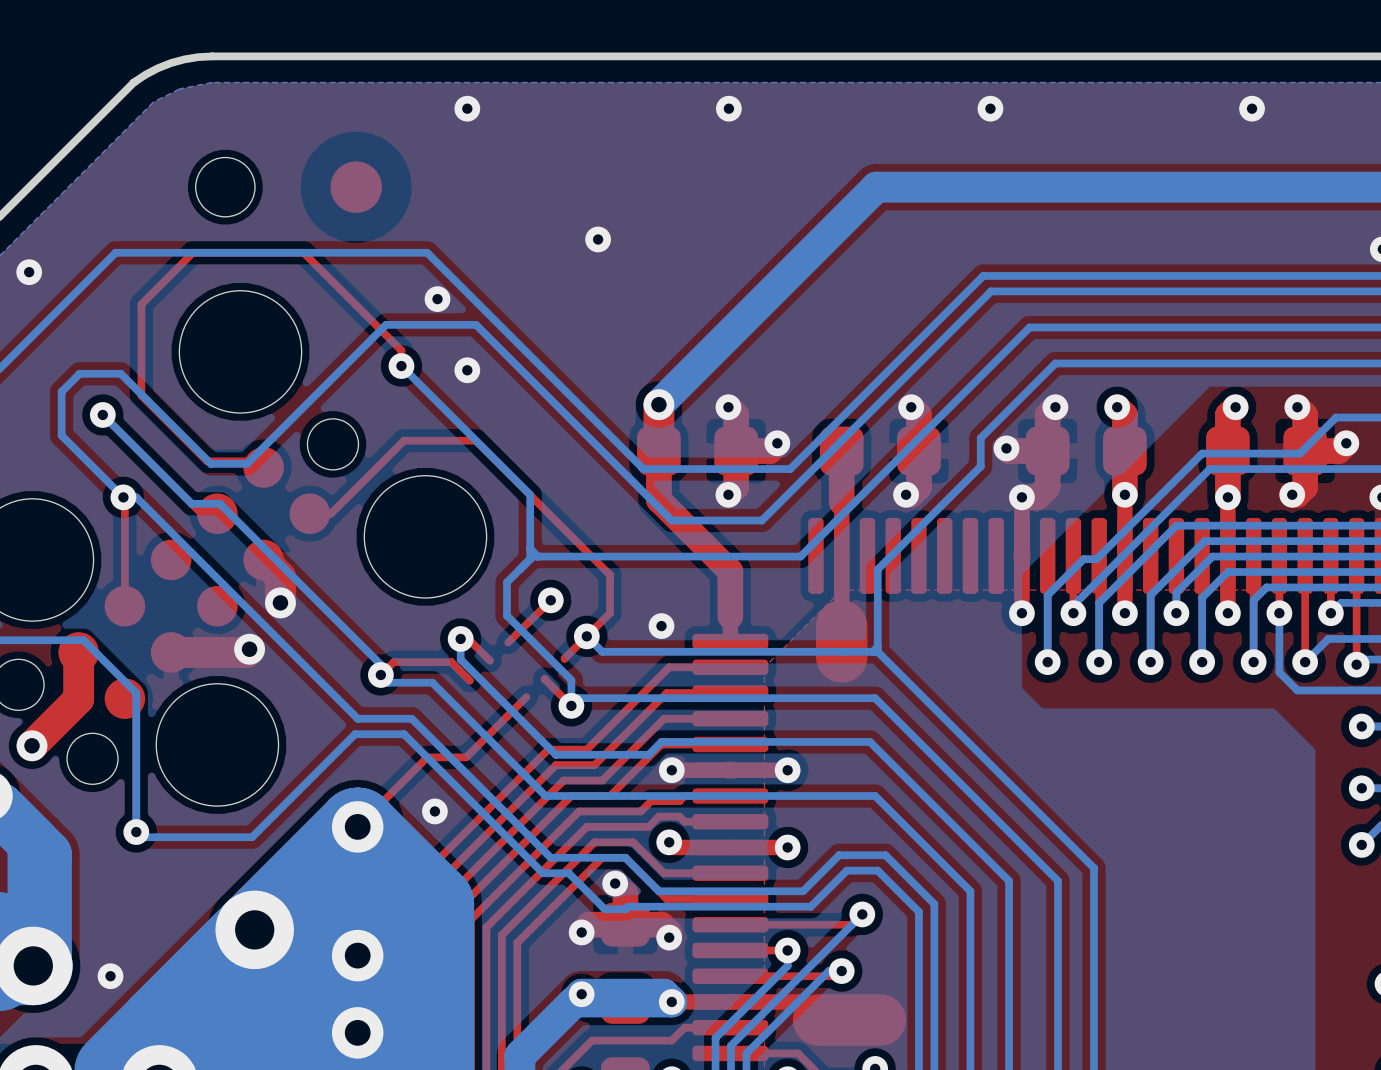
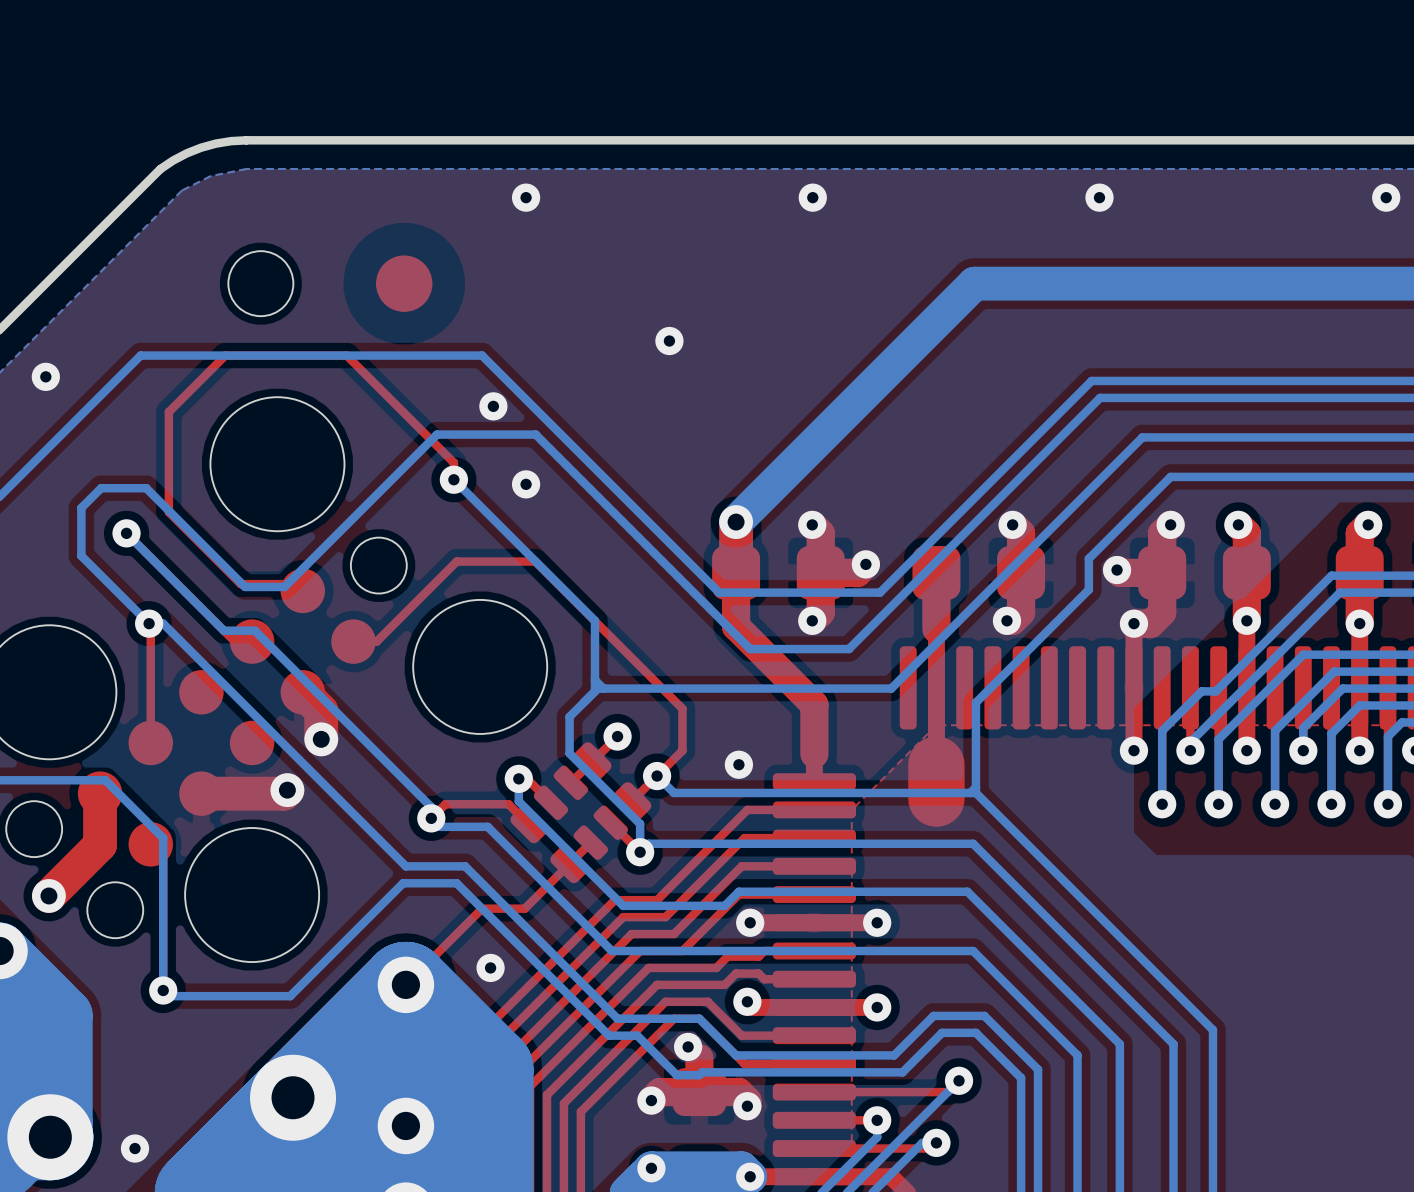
part: none -> (580, 812)

